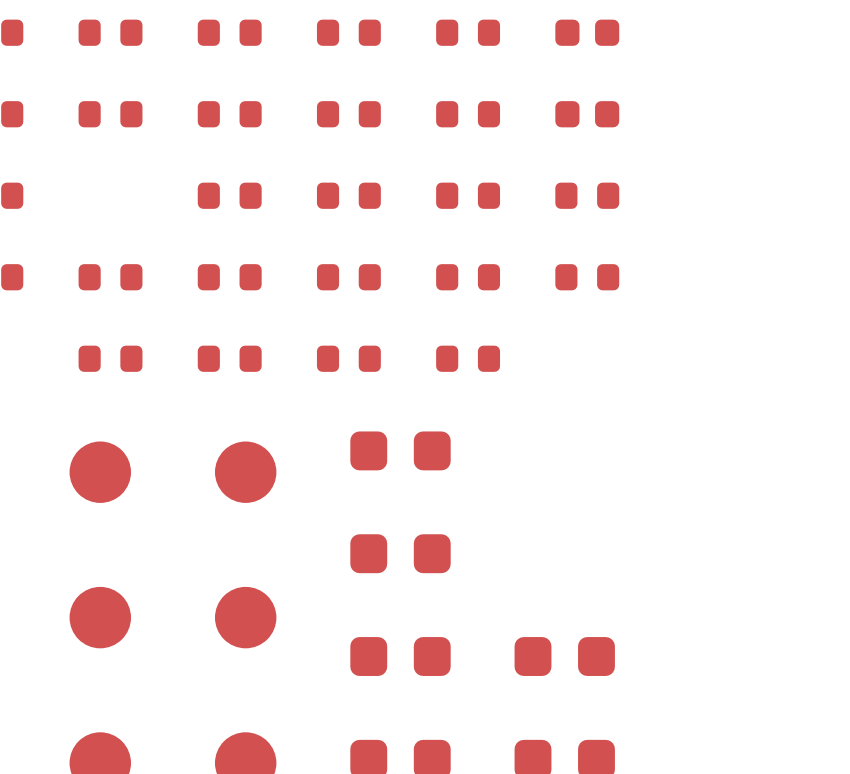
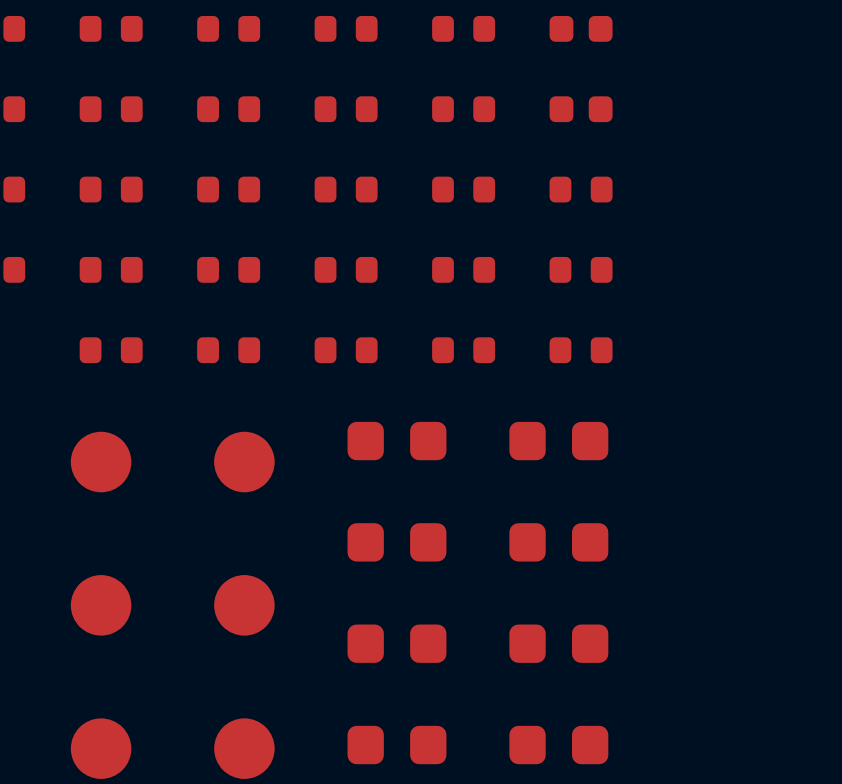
part: none -> (111, 189)
part: none -> (581, 350)
part: none -> (558, 441)
part: none -> (558, 542)

